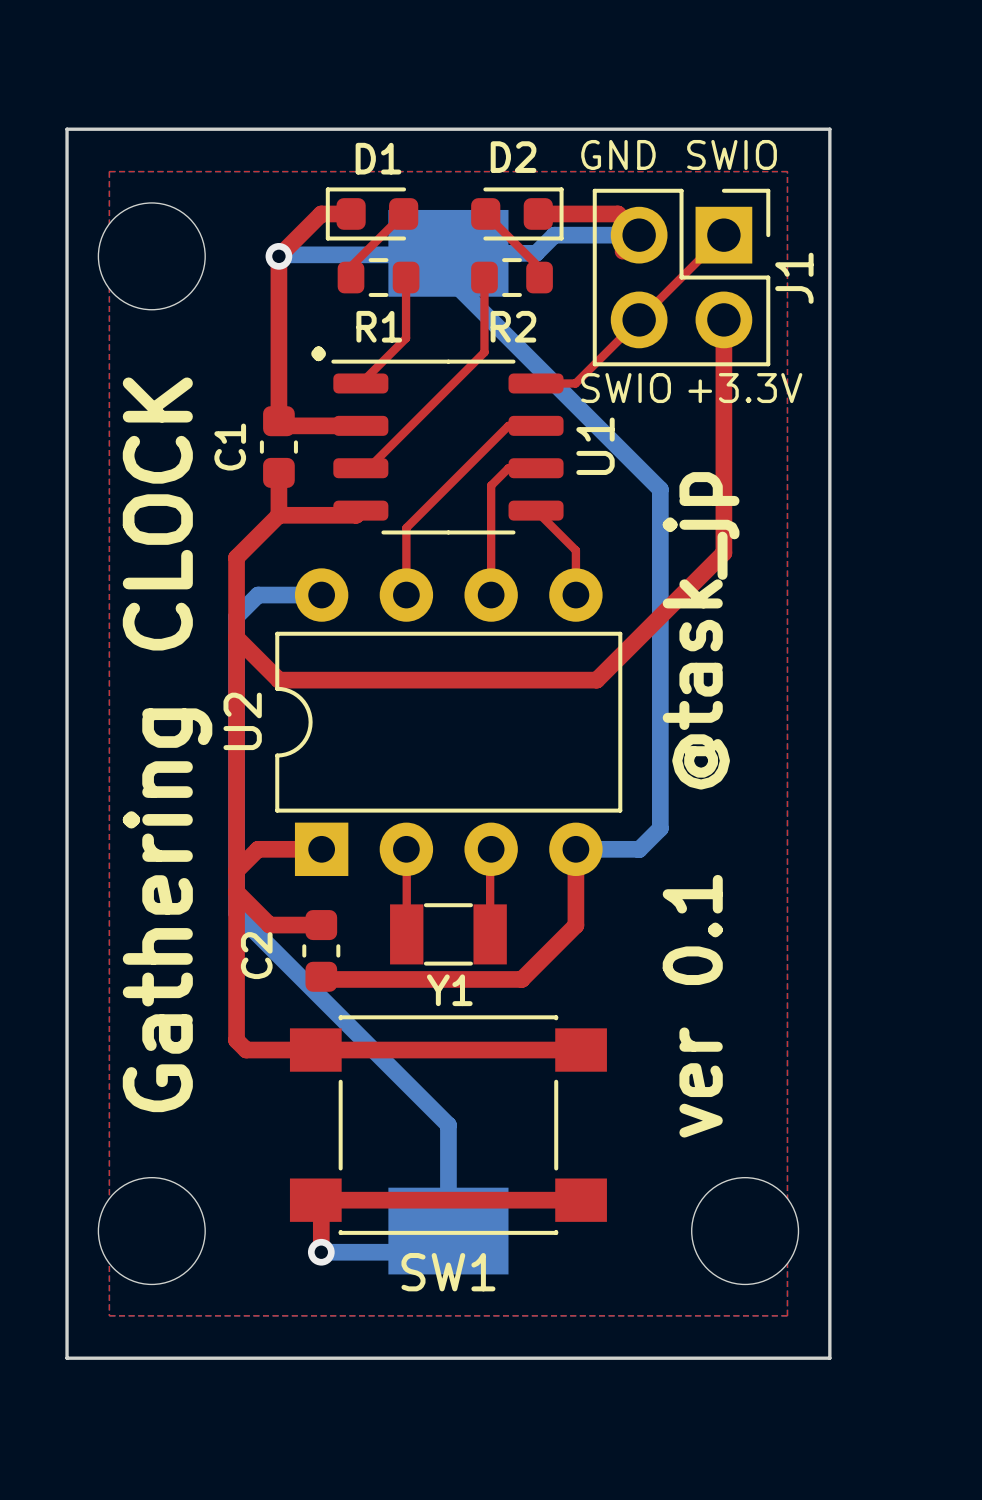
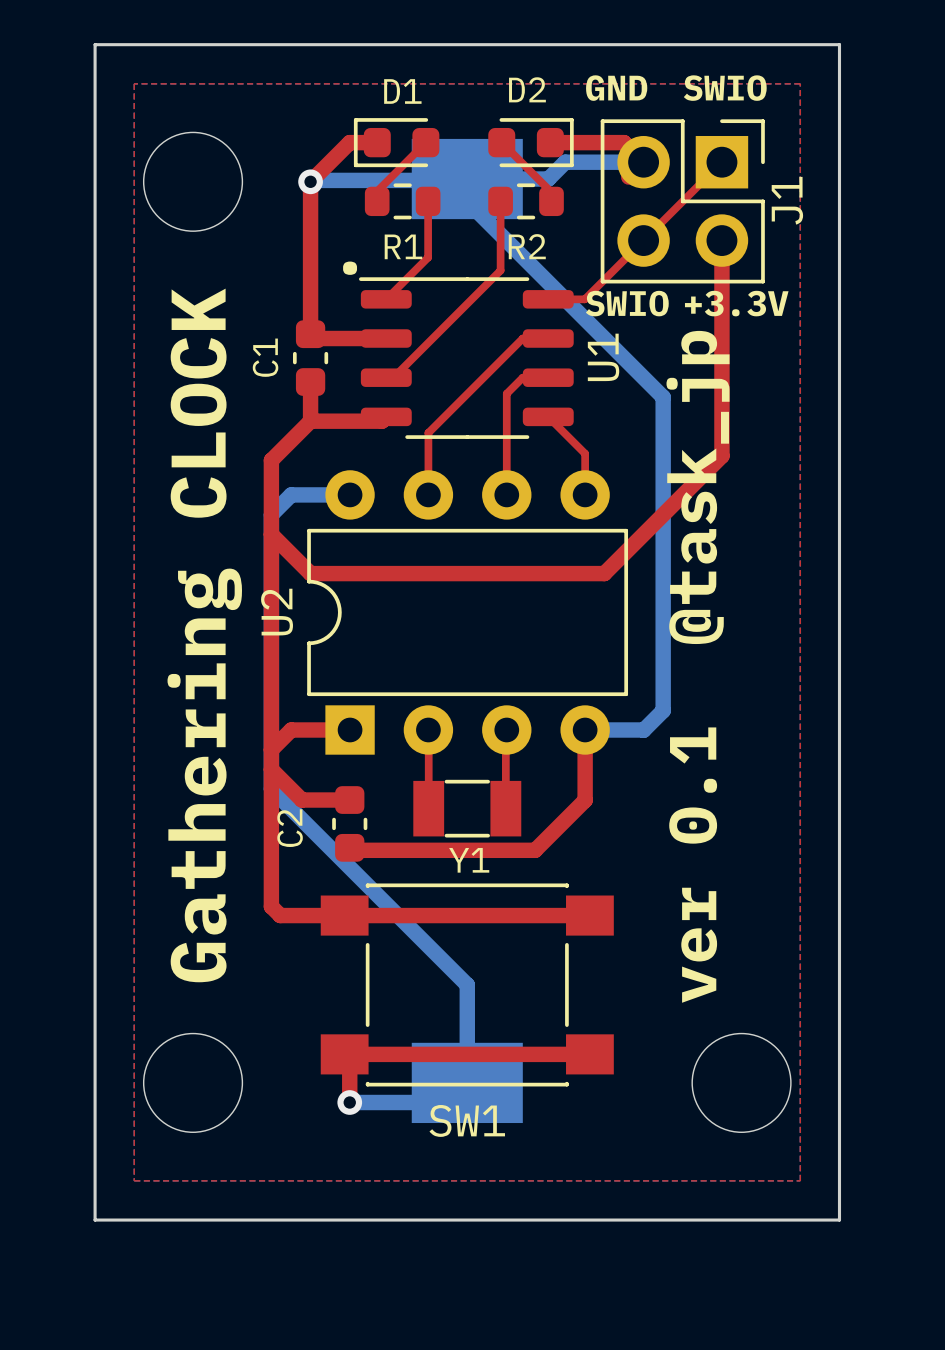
board edge: (67, 129) (829, 129) (829, 1358) (67, 1358) (67, 129) -> (95, 44) (95, 1220) (839, 1220) (839, 44) (95, 44)
top zone outline: (109, 171) (787, 171) (787, 1315) (109, 1315) (109, 171) -> (134, 83) (134, 1180) (800, 1180) (800, 83) (134, 83)

